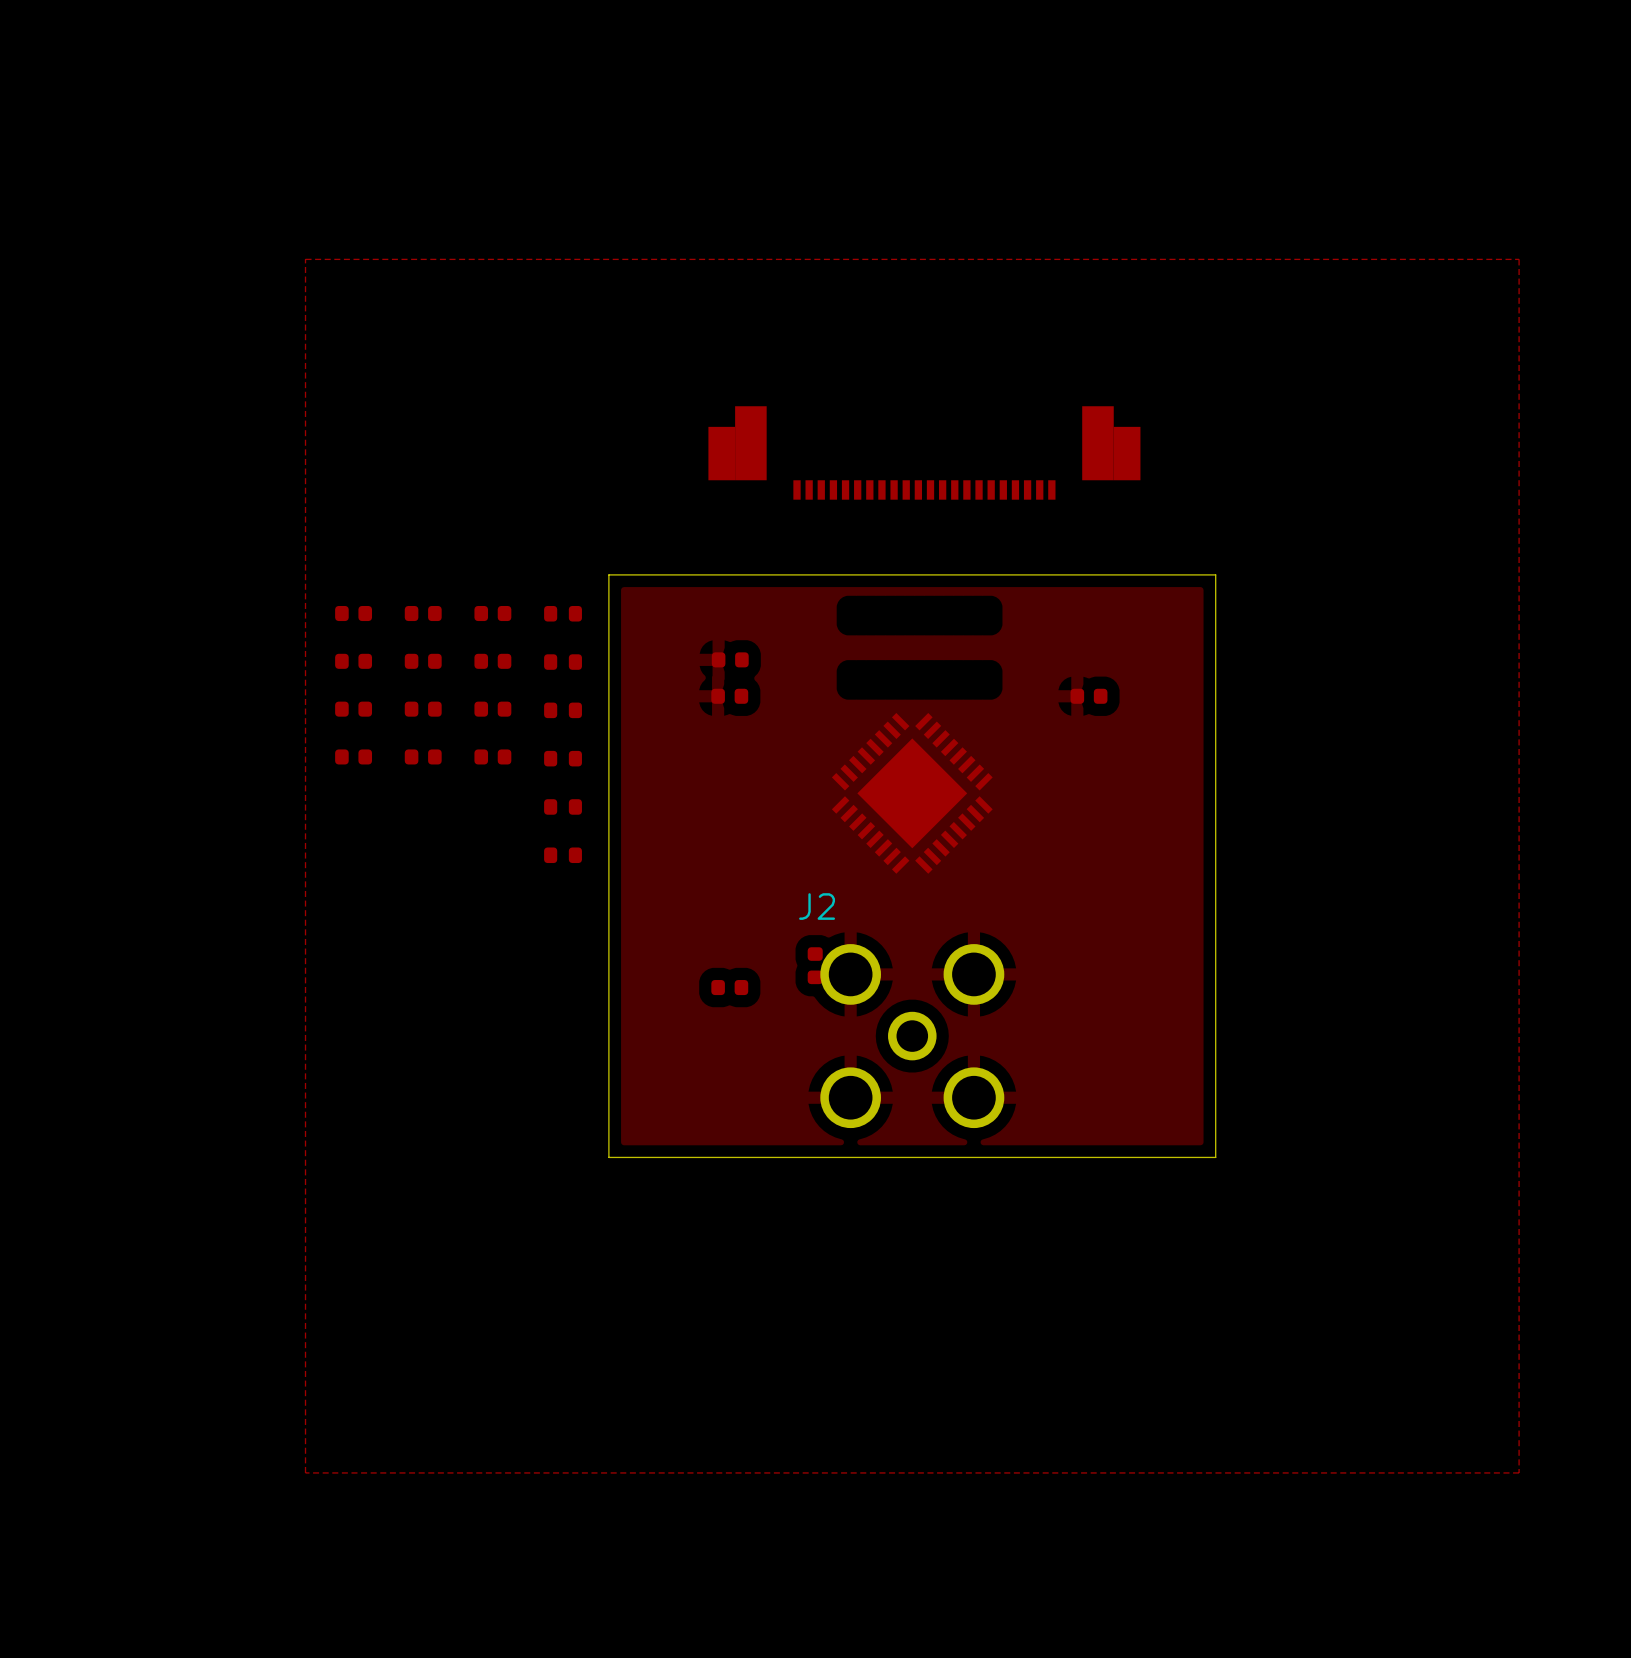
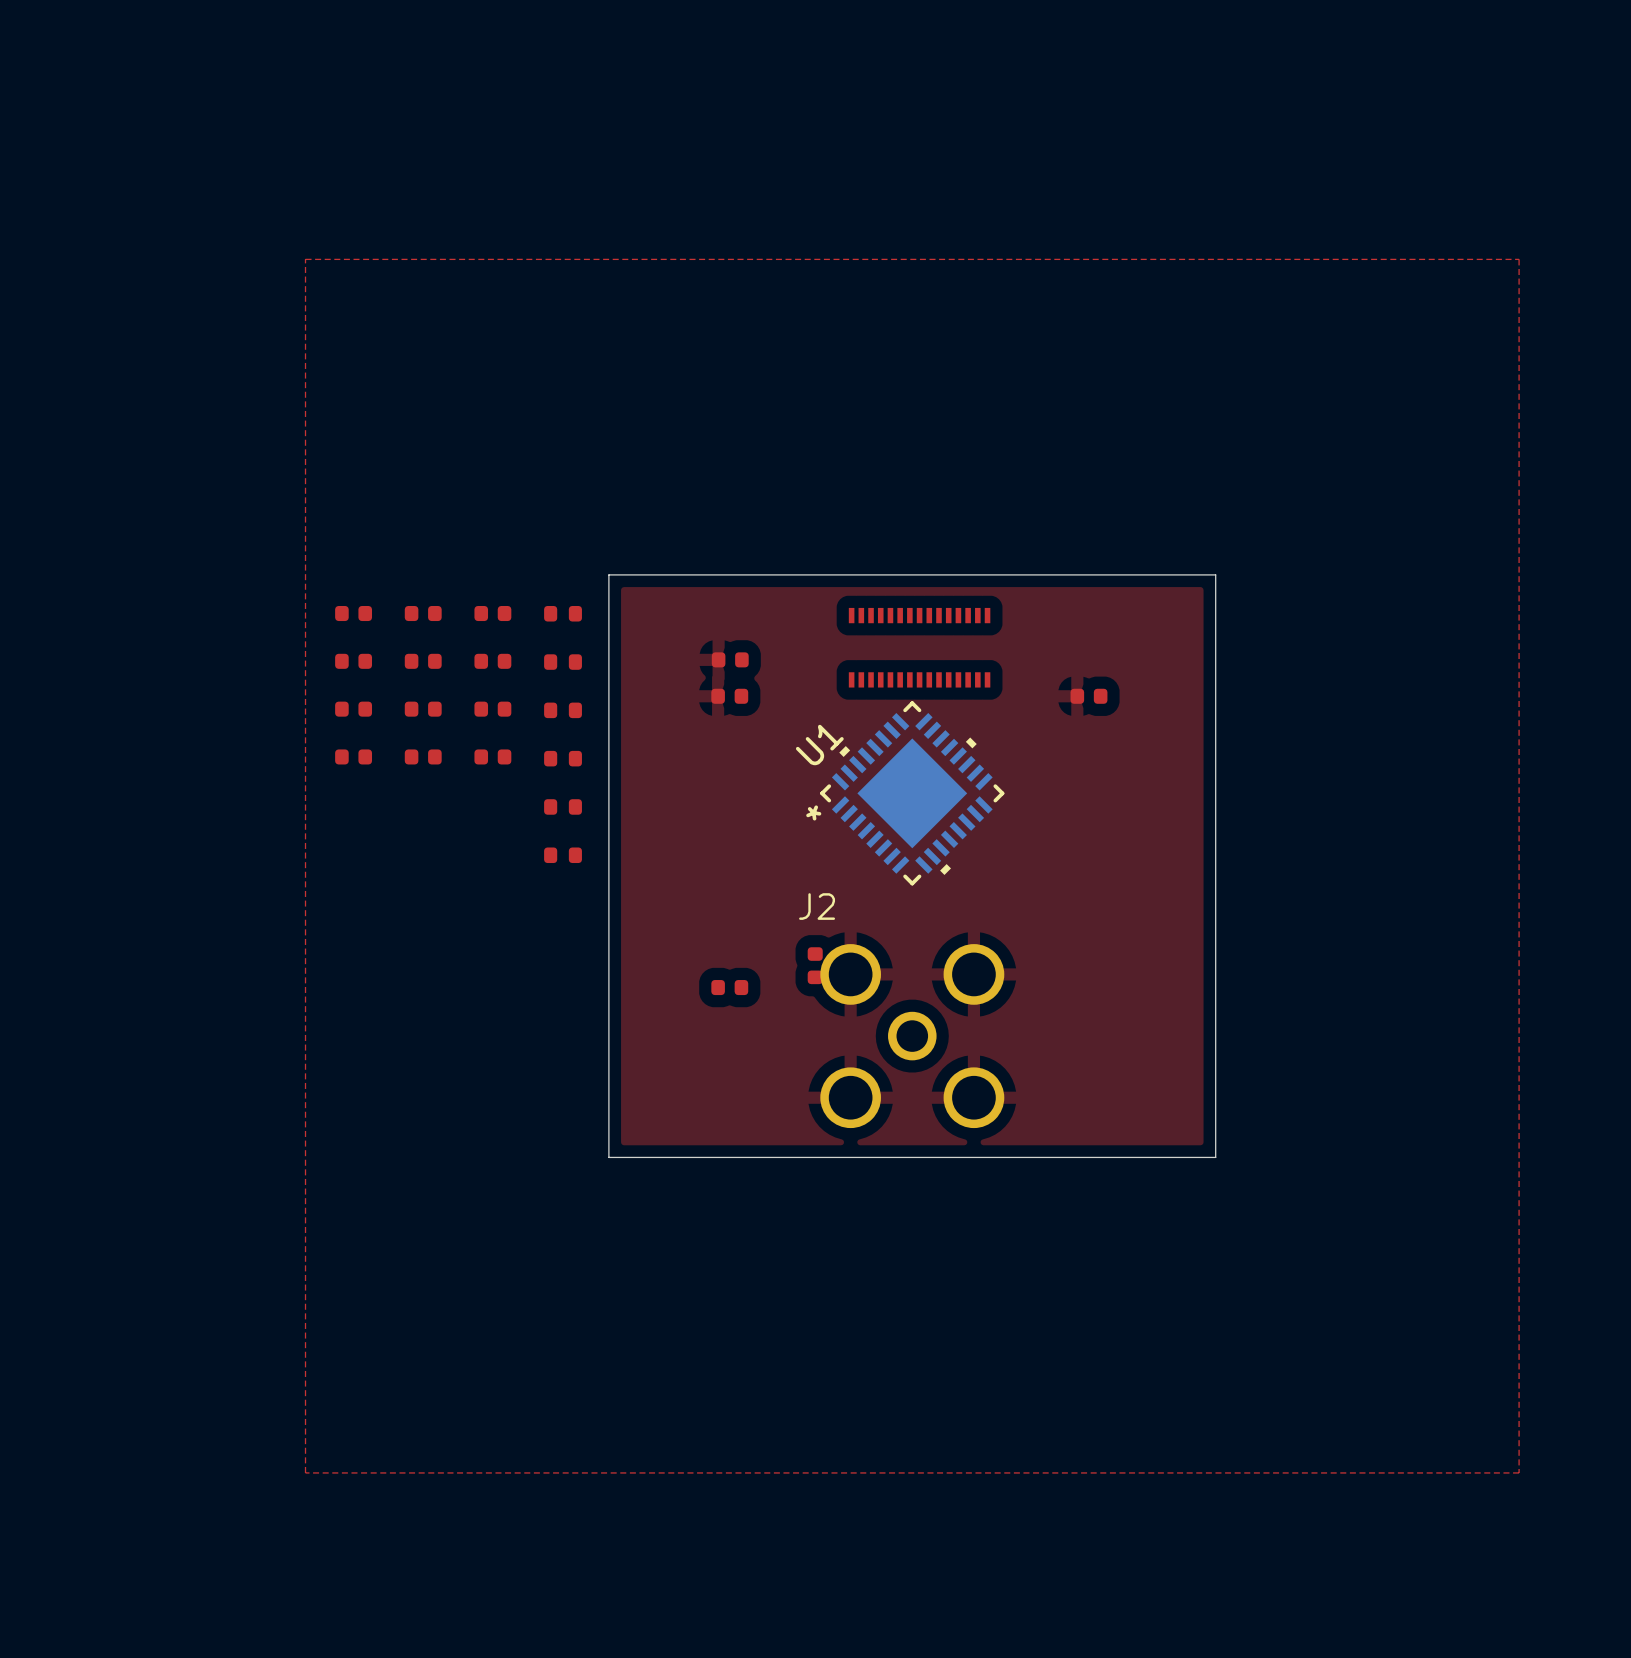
part: (924, 452) -> none
part: none -> (919, 647)
U1 side: top (912, 793) -> bottom (912, 793)

